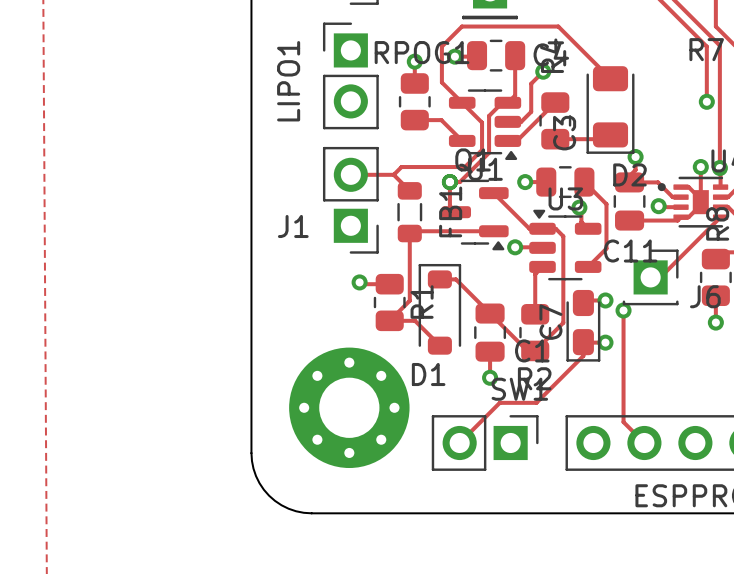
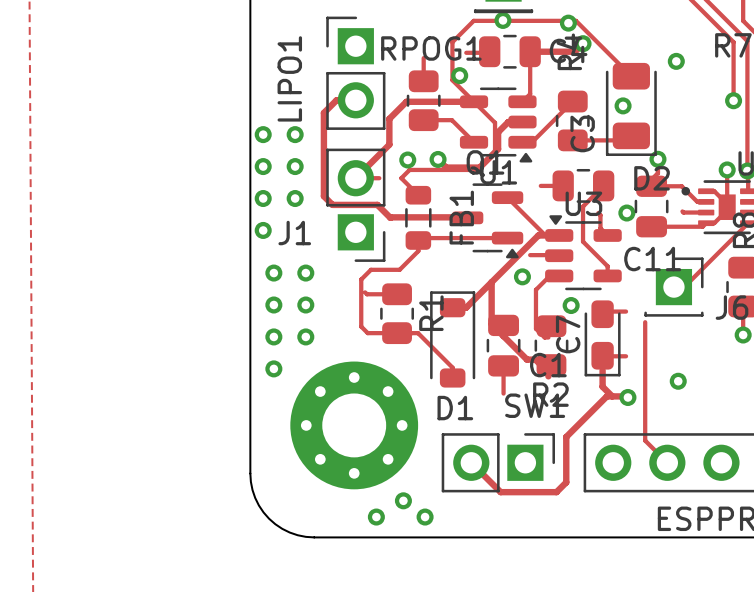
via: none -> (502, 20)
via: none -> (568, 23)
track: none -> (583, 43) (574, 51) (530, 51)
via: none -> (583, 43)
via: (454, 56) -> none
via: (414, 61) -> none
via: none -> (676, 61)
track: (543, 71) (531, 83) (531, 111) (521, 121) (507, 121) -> (438, 159) (446, 167) (479, 167) (498, 149) (498, 132) (508, 122) (522, 122)
via: (543, 71) -> none
via: none -> (459, 75)
track: none -> (355, 100) (336, 100) (323, 112) (323, 196) (332, 204) (377, 204) (390, 217) (459, 217)
track: none -> (474, 101) (406, 101) (389, 118) (389, 144) (355, 178)
track: (507, 102) (502, 102) (489, 115) (489, 152) (459, 182) (449, 182) (449, 205) (456, 212) -> none
via: none -> (623, 105)
via: none -> (263, 134)
via: none -> (295, 134)
via: none -> (407, 160)
via: none -> (438, 159)
via: none -> (263, 166)
via: none -> (295, 166)
track: (372, 174) (393, 174) -> none
via: (449, 182) -> none
via: (525, 182) -> none
track: (584, 182) (606, 204) (606, 248) (588, 266) -> (603, 185) (583, 206) (583, 241) (607, 266) (607, 275)
via: none -> (263, 198)
via: none -> (295, 198)
via: (658, 206) -> none
via: (579, 207) -> none
via: none -> (626, 213)
via: none -> (263, 230)
track: none -> (545, 235) (538, 235) (466, 307) (452, 307)
track: (542, 228) (555, 228) (563, 236) (563, 322) (535, 350) (527, 350) (455, 279) (439, 279) -> none
track: (409, 243) (409, 300) (389, 320) -> (418, 251) (399, 269) (370, 269) (361, 279) (361, 326) (367, 333) (397, 333)
via position: (515, 247) -> (522, 276)
via: none -> (273, 273)
via: none -> (305, 273)
track: (542, 266) (535, 274) (535, 314) -> (559, 275) (549, 275) (535, 289) (535, 328) (544, 337) (548, 337)
track: none -> (491, 282) (491, 324) (526, 359) (535, 359) (548, 372) (548, 376)
via: (359, 282) -> none
via: none -> (273, 305)
via: none -> (305, 305)
via: none -> (571, 305)
via: (605, 300) -> none
D1 position: (439, 309) -> (452, 339)
via: (623, 310) -> none
track: (409, 320) (415, 320) (439, 345) -> (418, 333) (452, 367) (452, 377)
via: none -> (273, 336)
via: none -> (305, 336)
via: (605, 342) -> none
via: none -> (273, 368)
track: (583, 355) (536, 402) (499, 402) (459, 442) -> (627, 397) (606, 396) (566, 436) (566, 482) (556, 492) (500, 492) (471, 462)
track: none -> (602, 370) (602, 386) (612, 396)
via: none -> (678, 381)
D1 name position: D1 (428, 374) -> D1 (455, 408)
via: (490, 377) -> none
via: none -> (627, 397)
via: none -> (403, 500)
via: none -> (376, 517)
via: none -> (425, 517)

